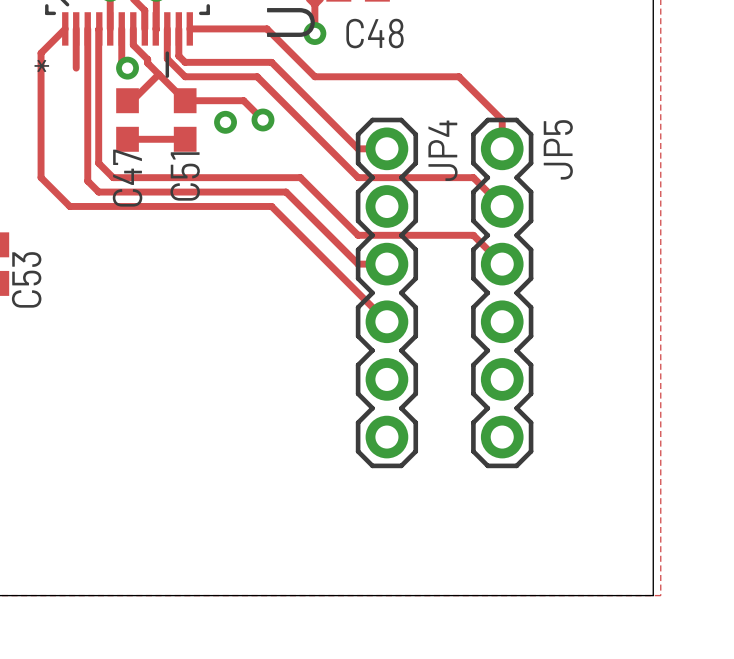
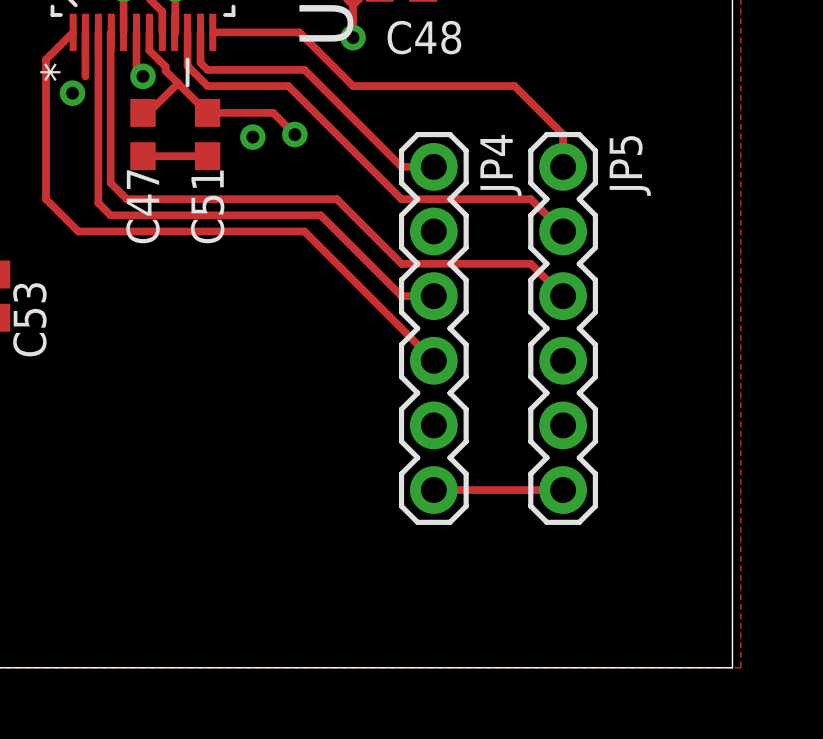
via: none -> (72, 93)
track: none -> (433, 490) (563, 490)

